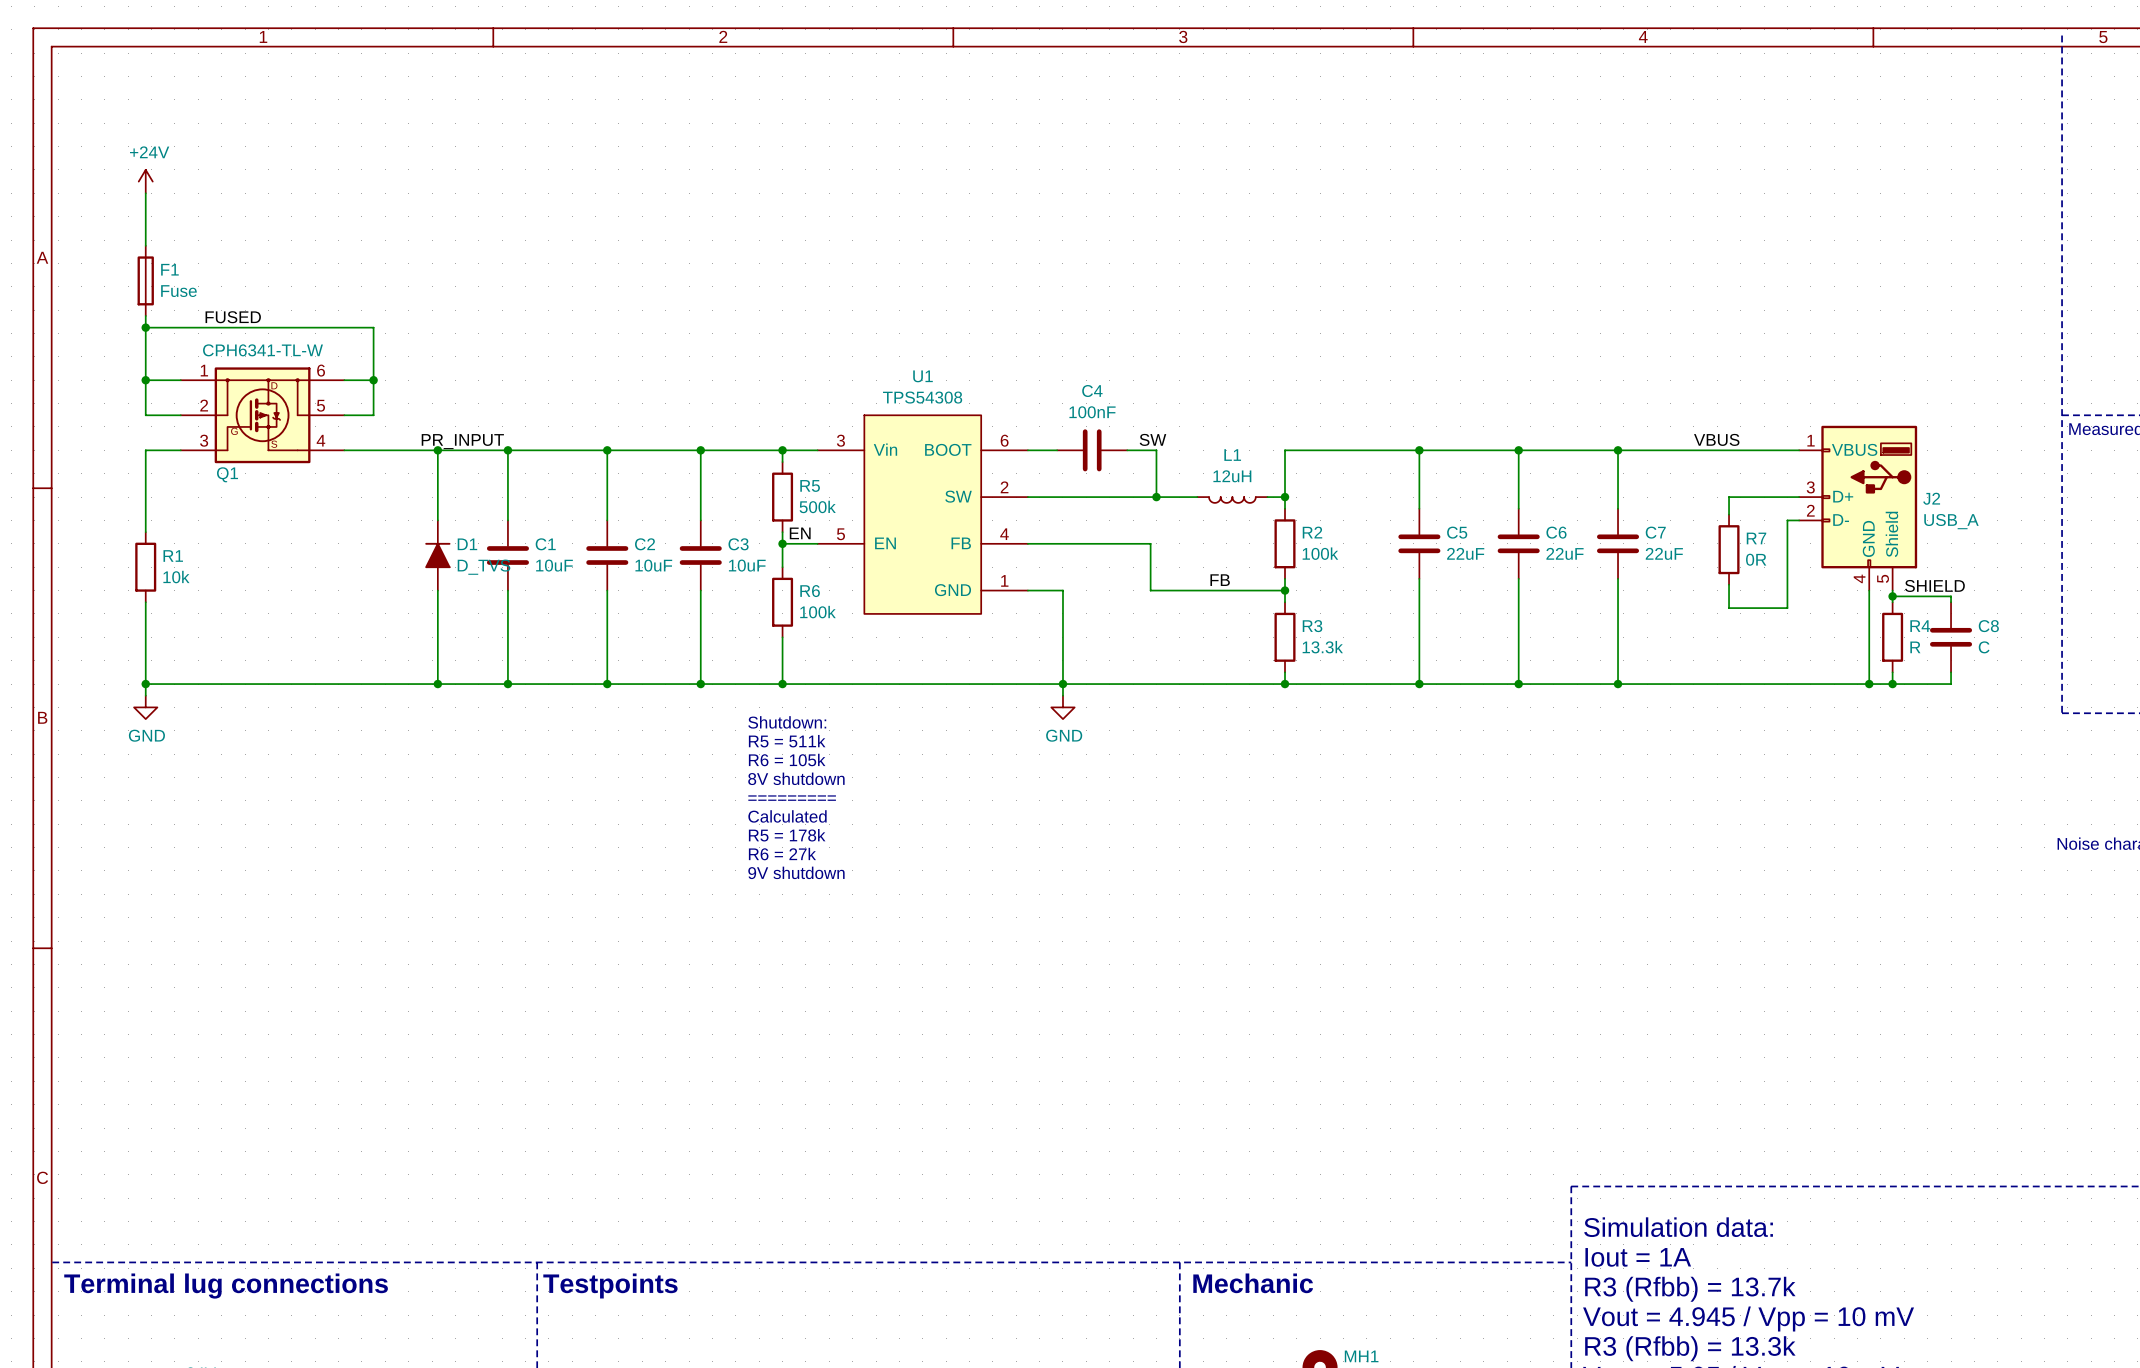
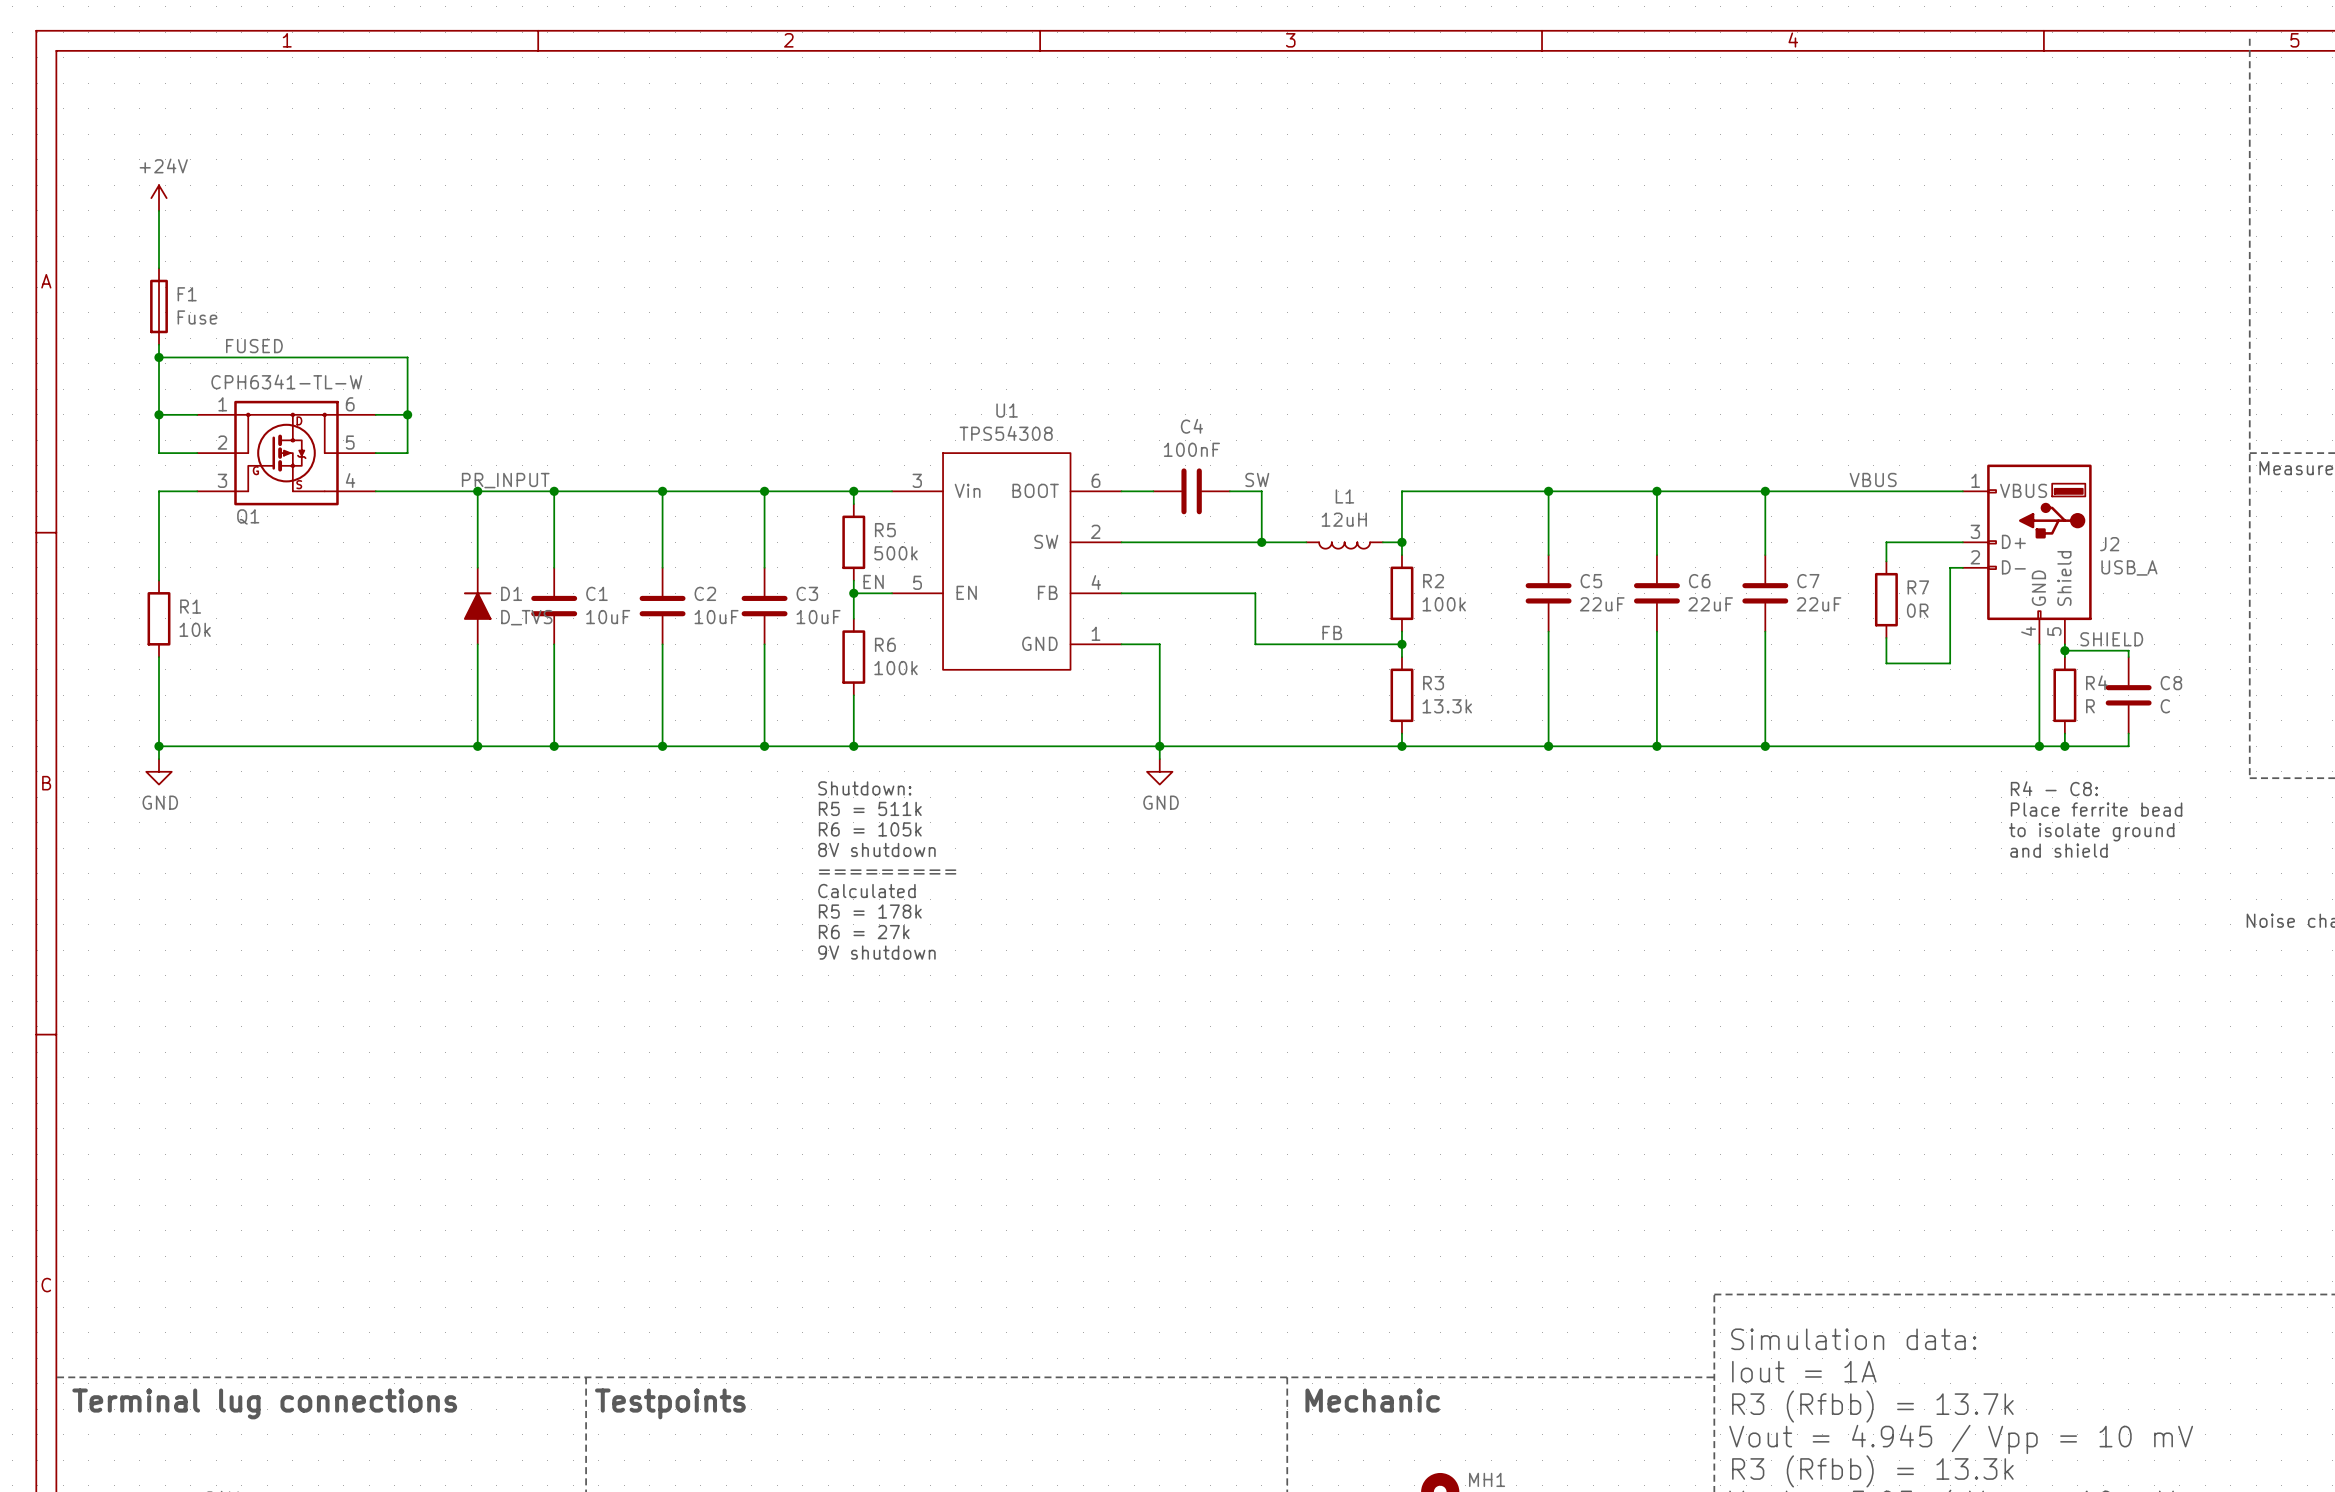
text: none -> R4 - C8: (2054, 788)
text: none -> Place ferrite bead (2096, 809)
text: none -> to isolate ground (2091, 832)
text: none -> and shield (2058, 850)

